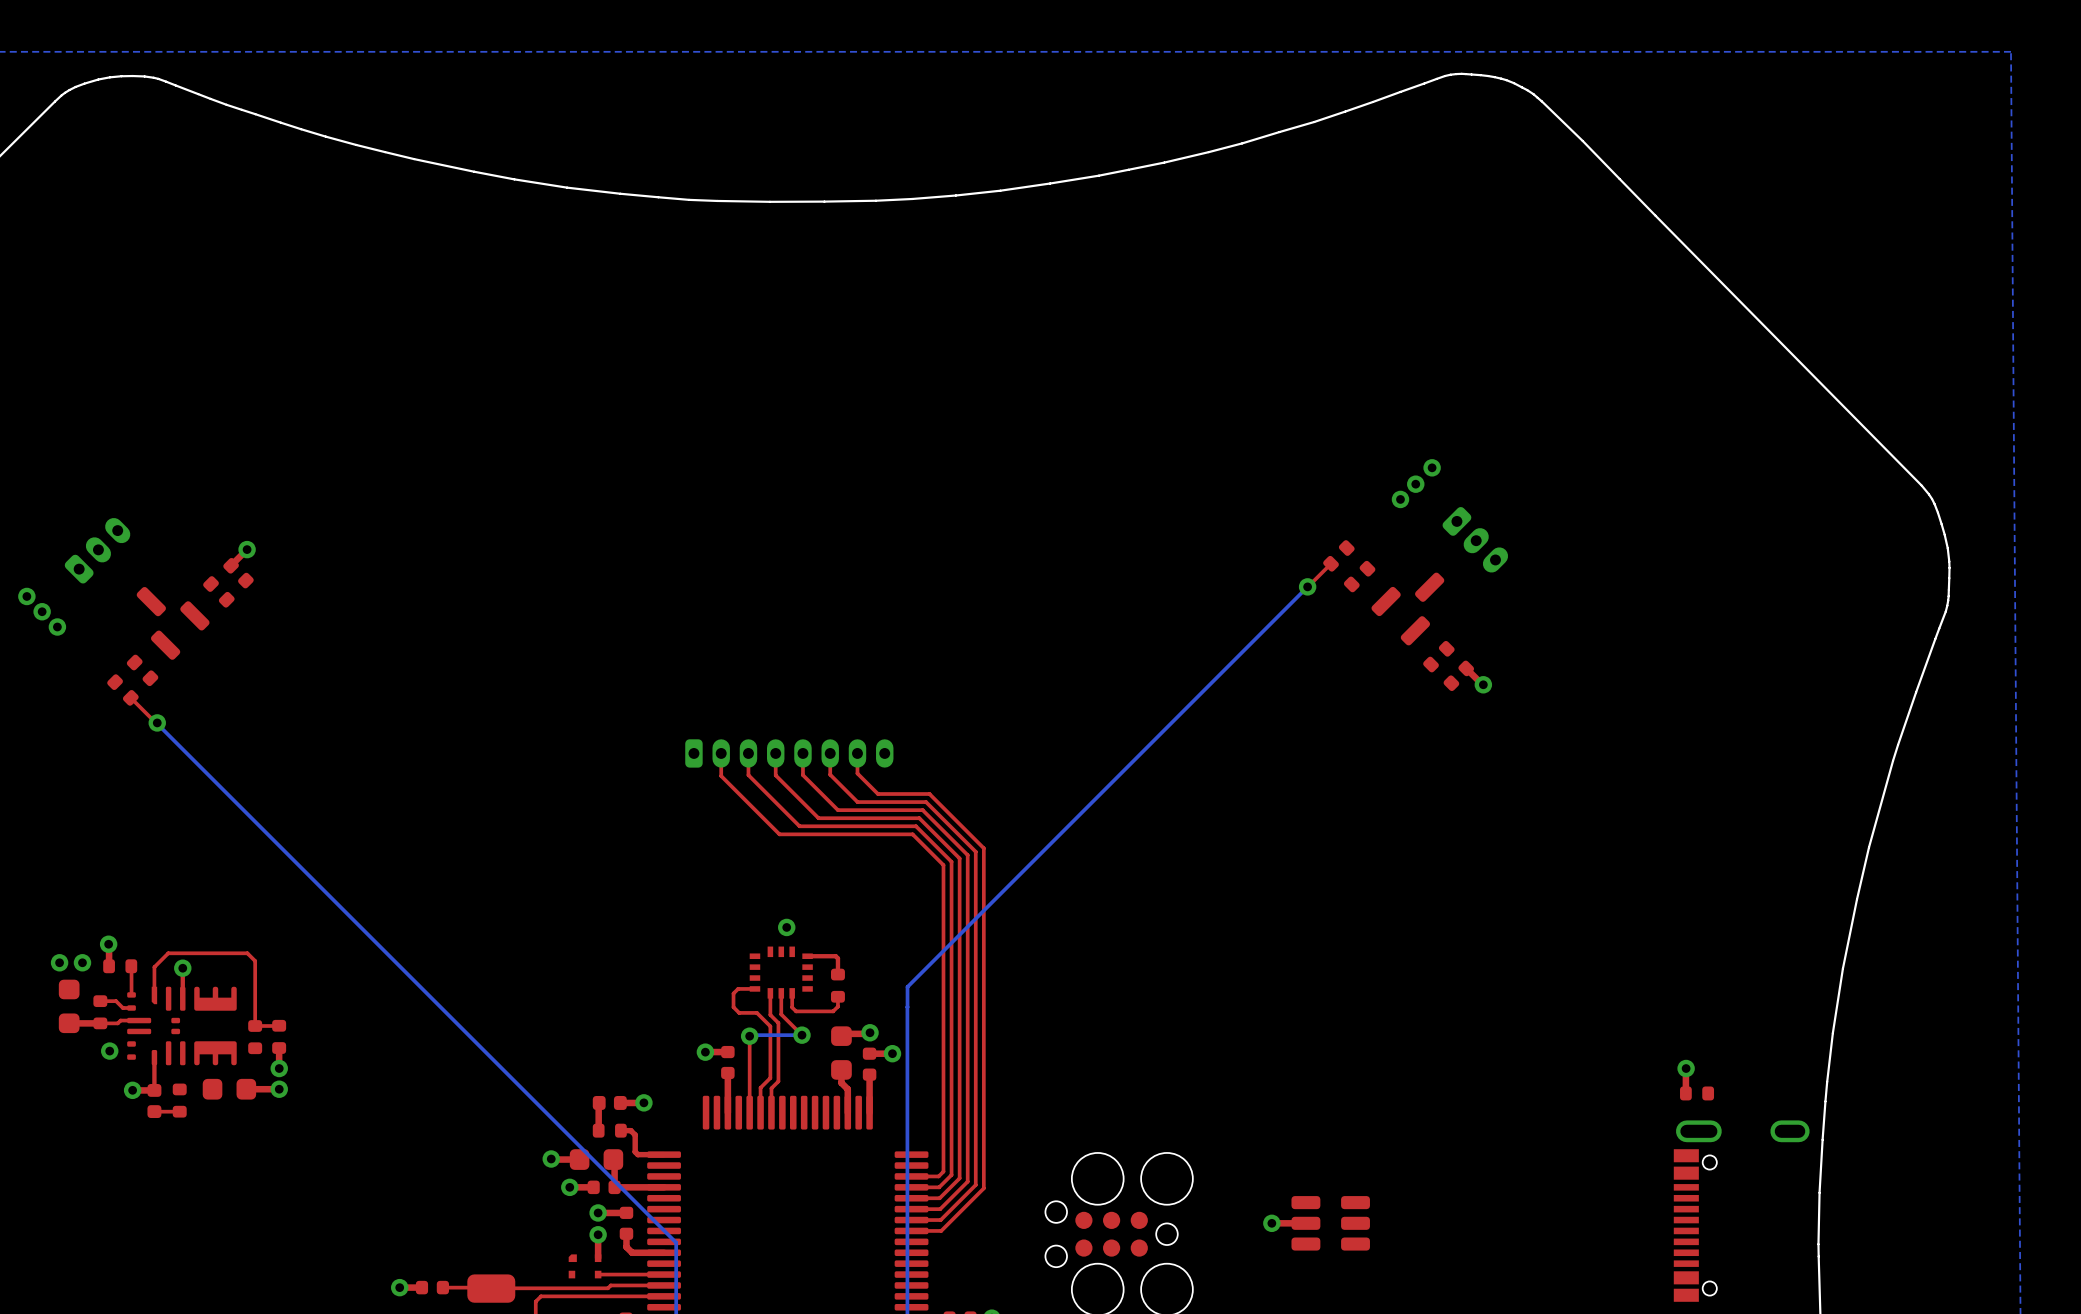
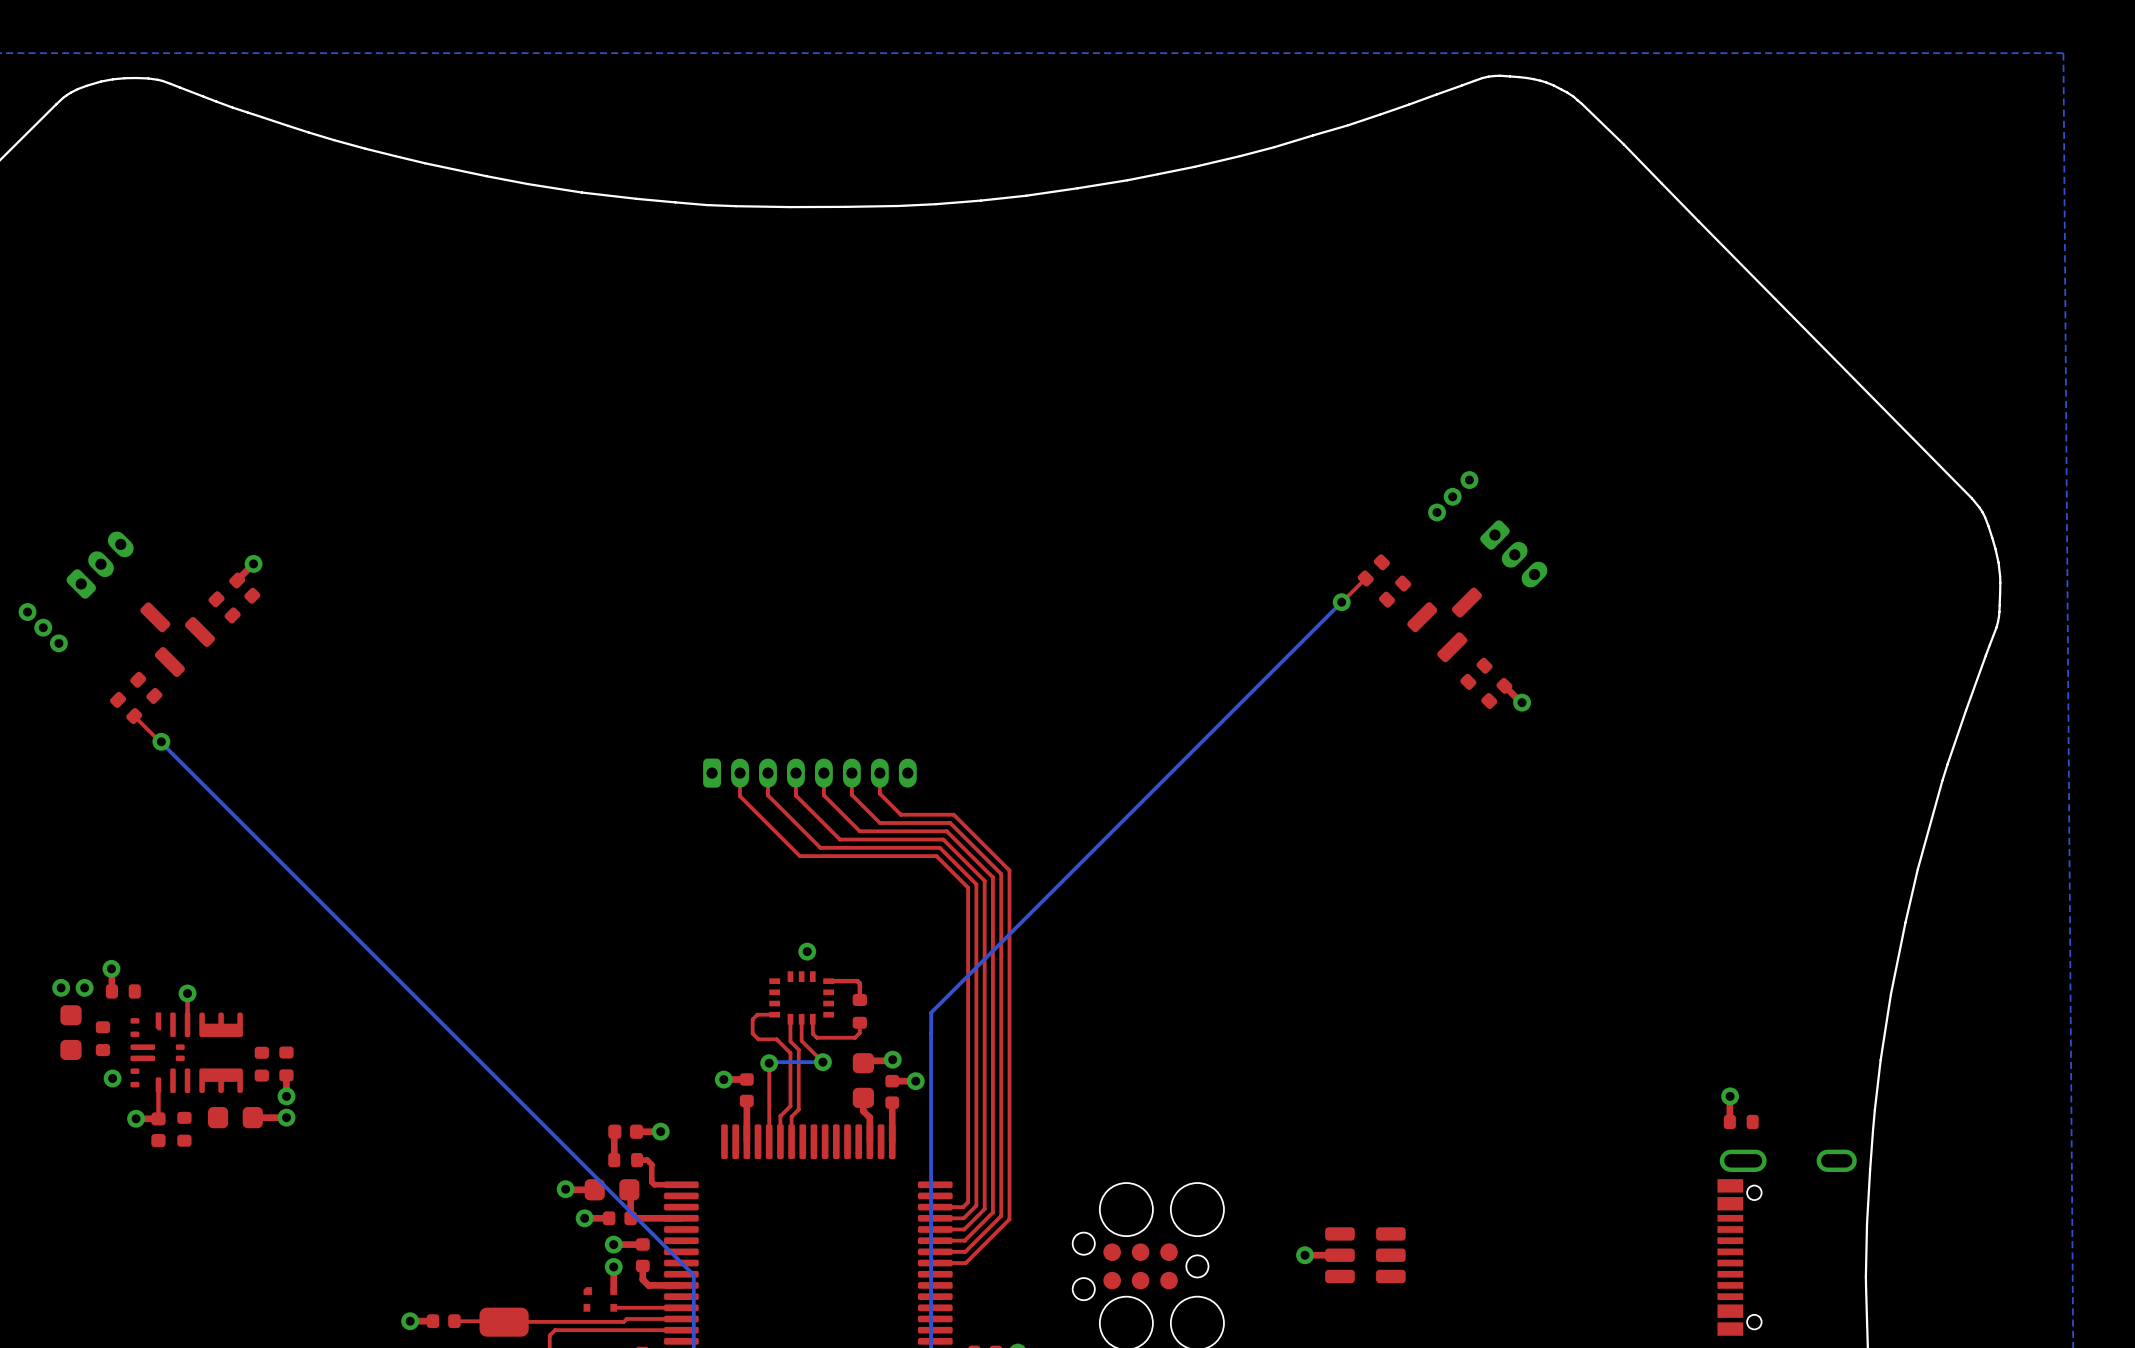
top track: (131, 966) (131, 994) -> none
top track: (154, 995) (154, 967) (168, 953) (247, 953) (255, 961) (255, 1026) (278, 1026) -> none
top track: (100, 1001) (116, 1001) (122, 1008) (131, 1008) -> none
top track: (139, 1020) (120, 1020) (117, 1023) (69, 1023) -> none
top track: (179, 1111) (154, 1111) -> none

